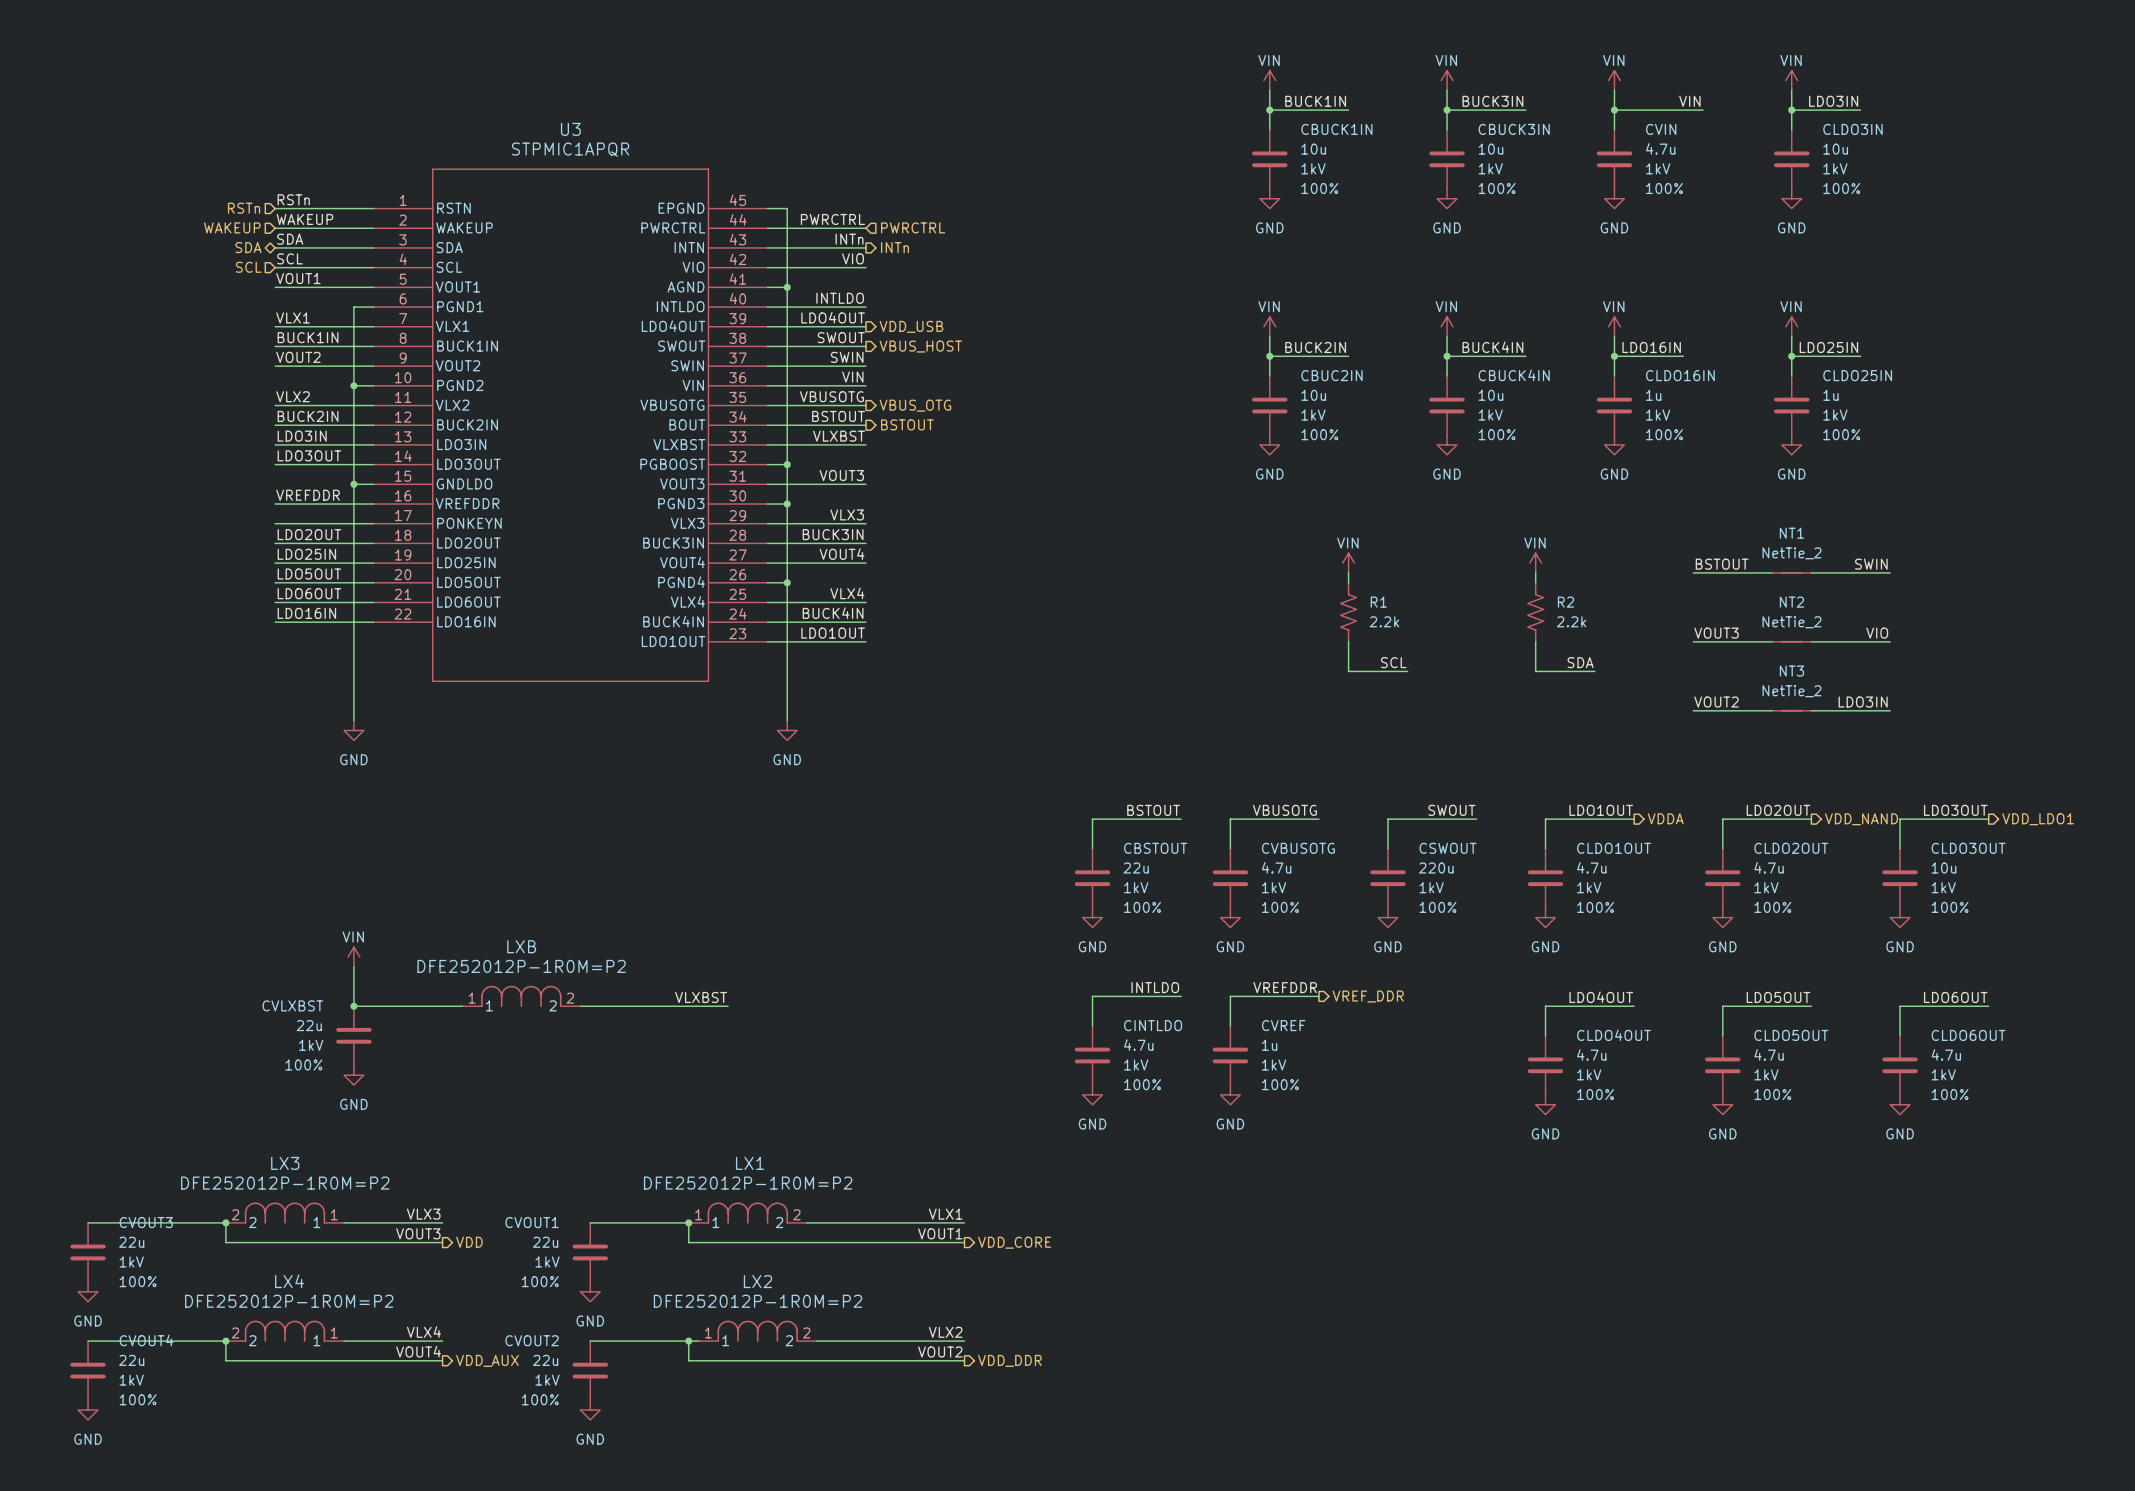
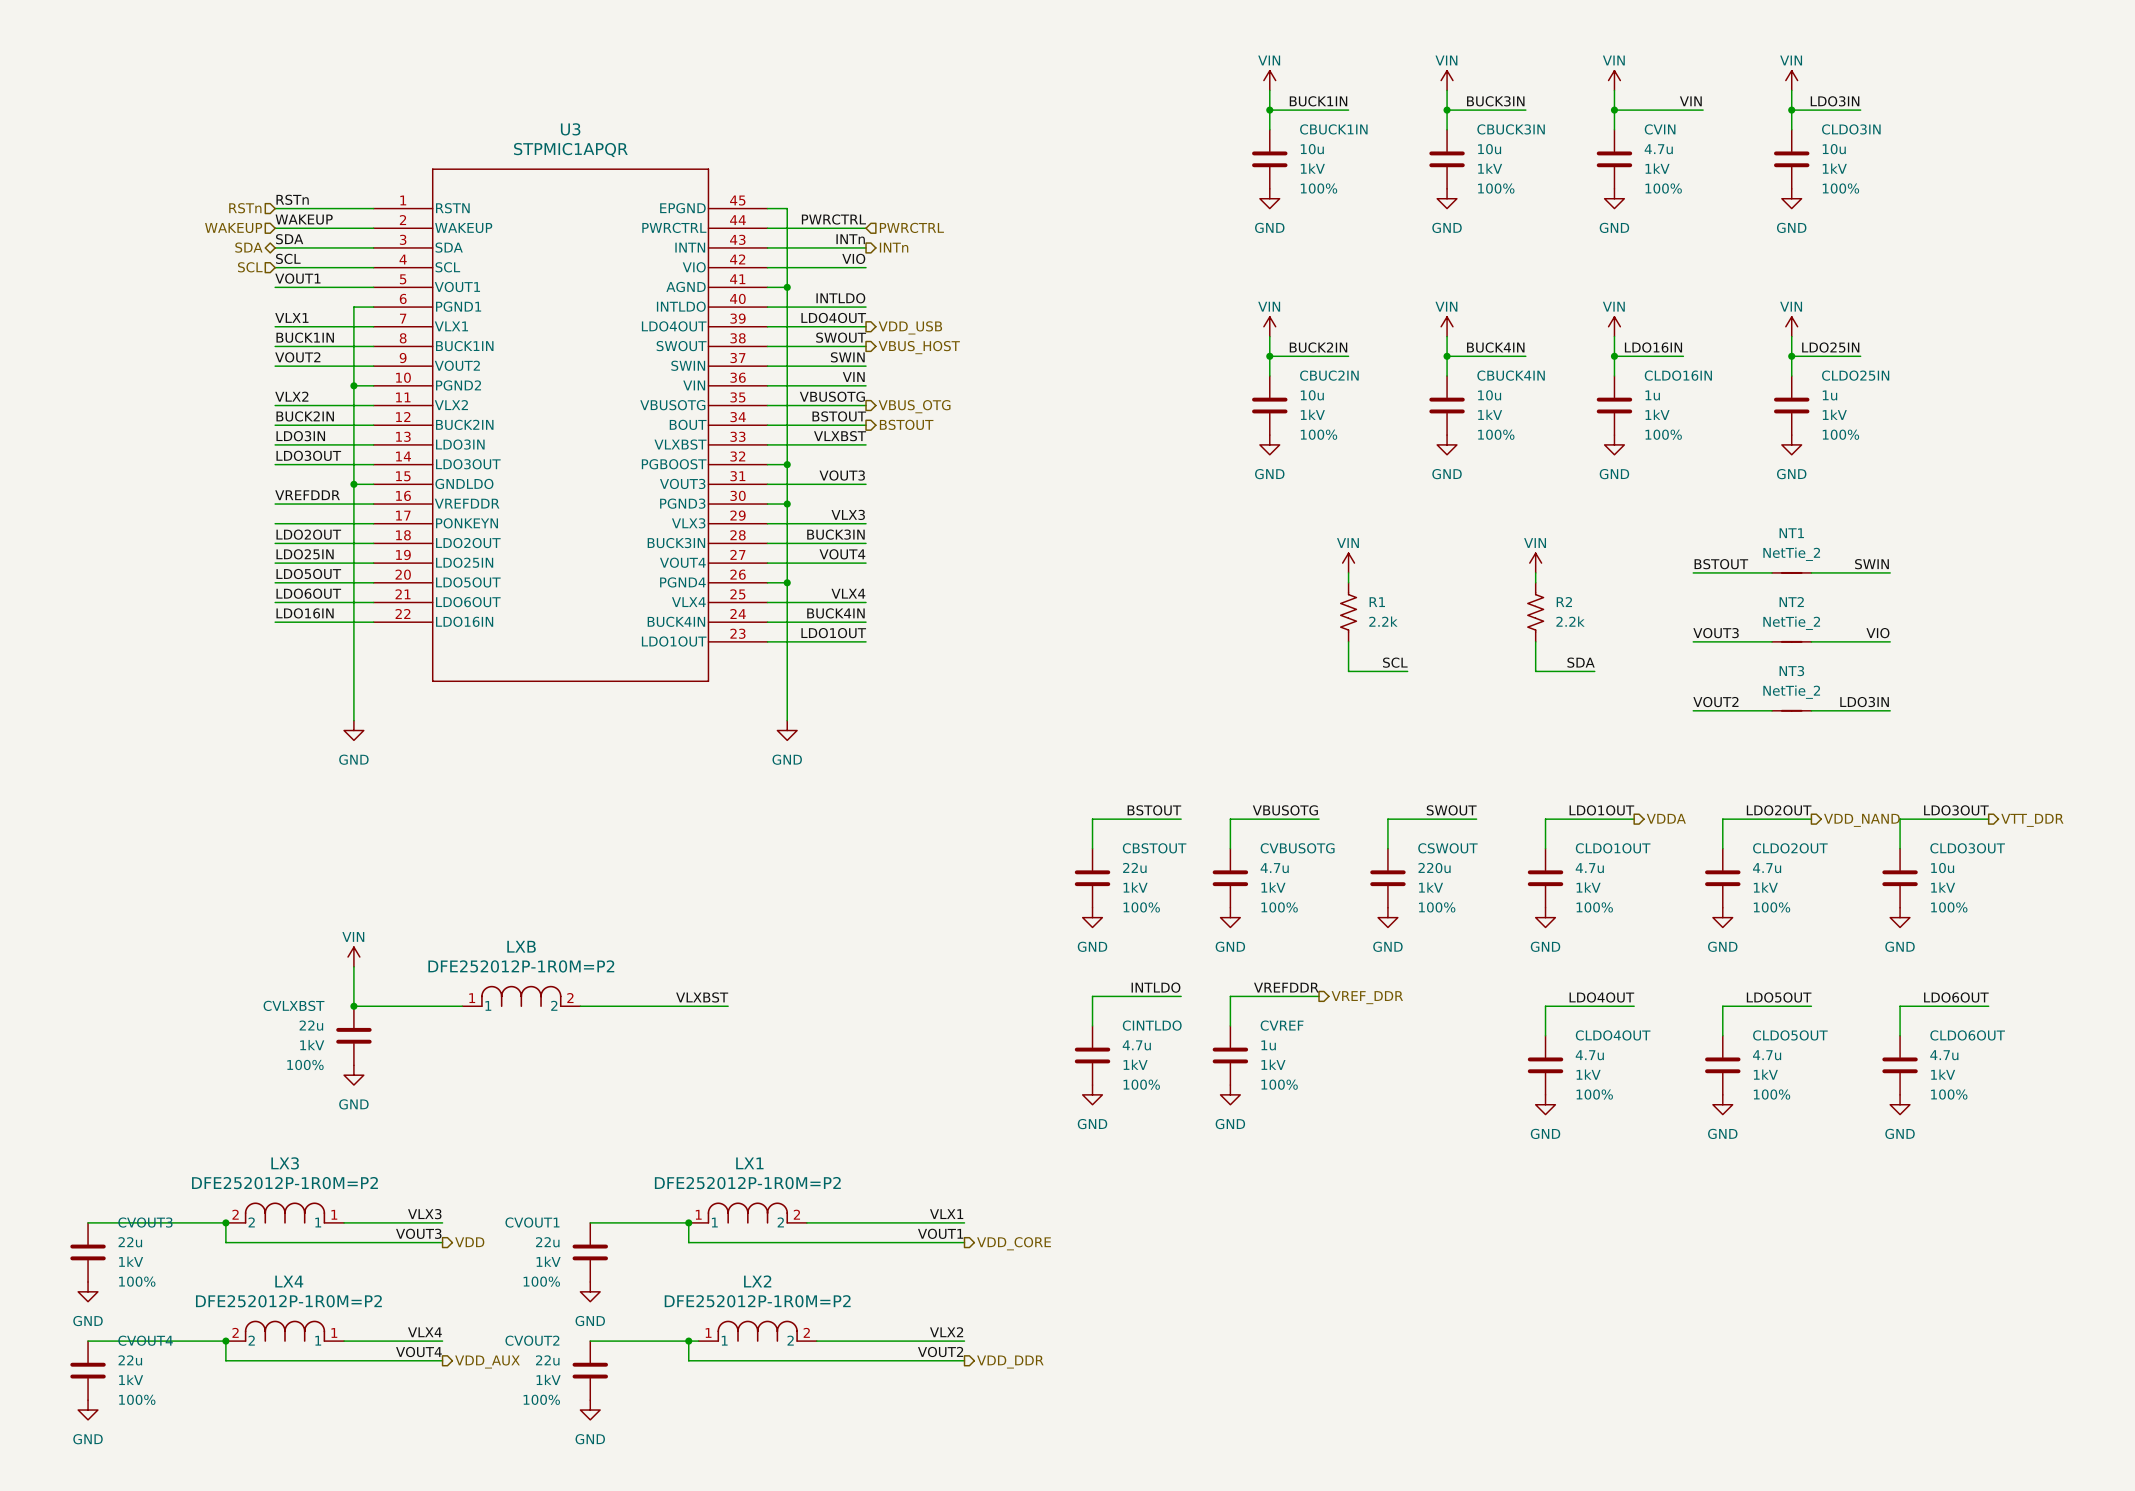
hierarchical label: VDD_LDO1 (2038, 819) -> VTT_DDR (2032, 820)

